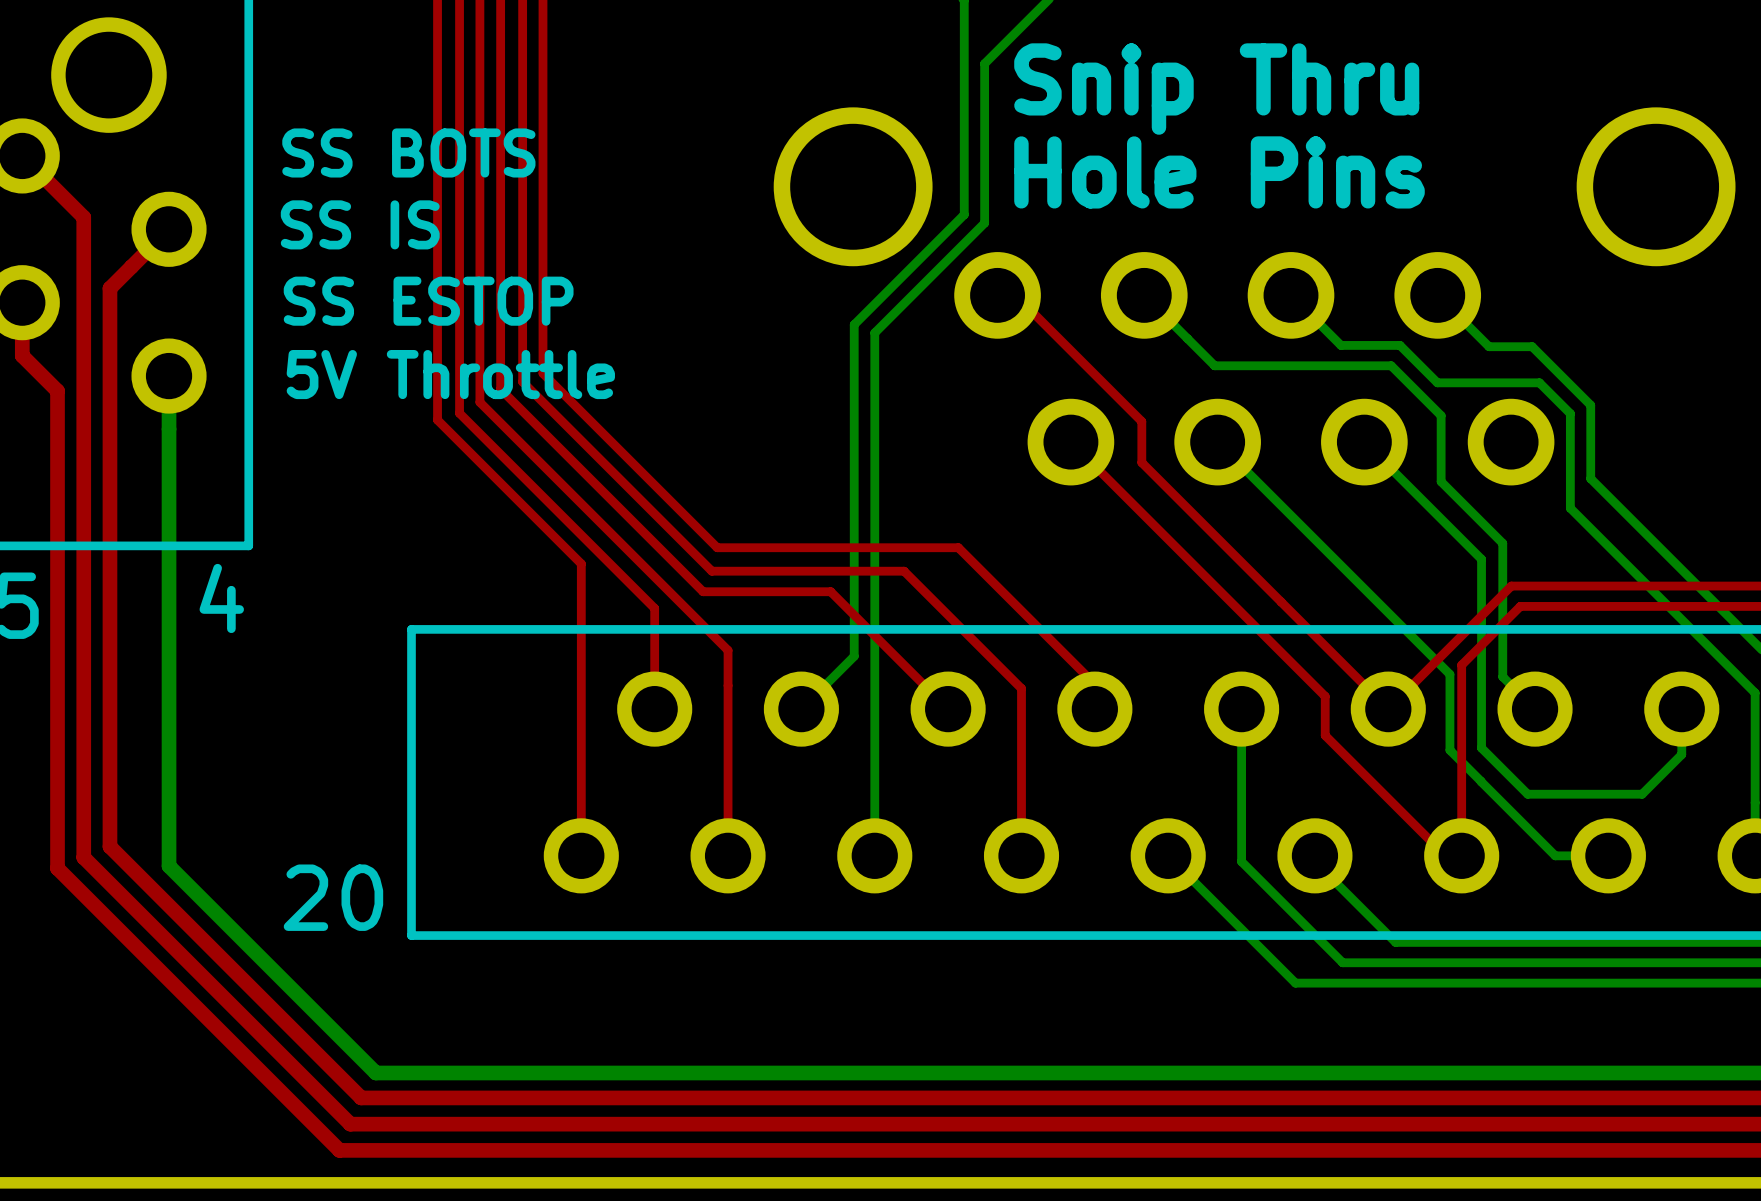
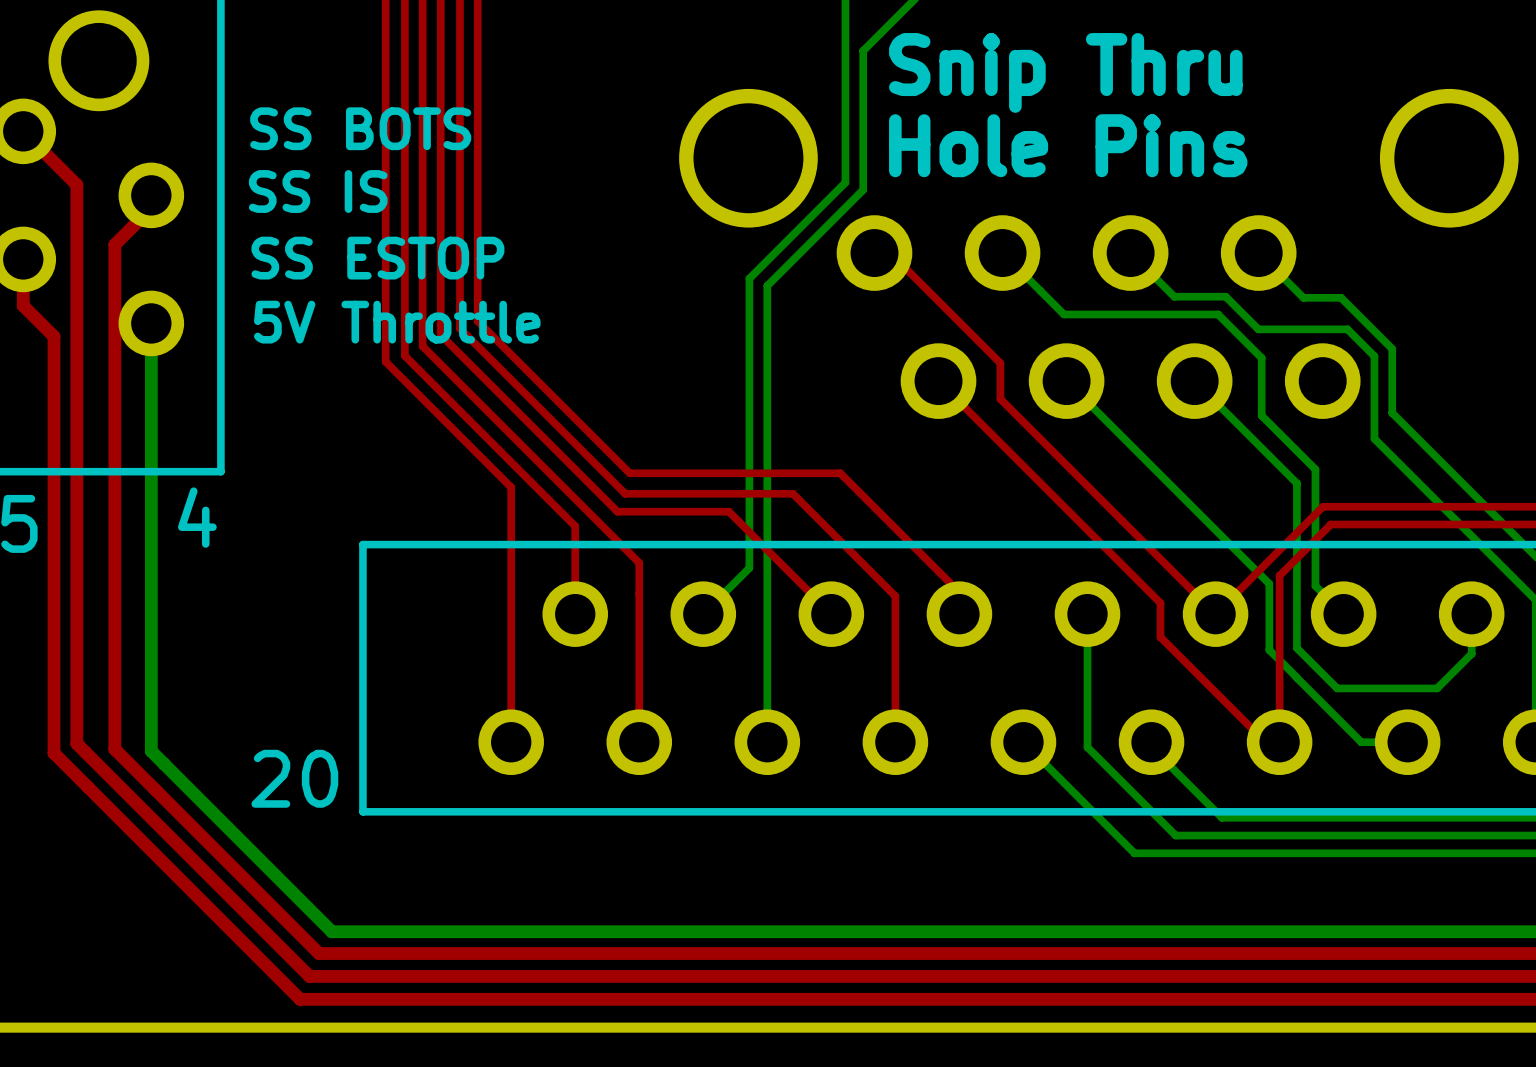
top track: (169, 229) (109, 288) (109, 846) (127, 863) -> (164, 195) (114, 244) (114, 749)

